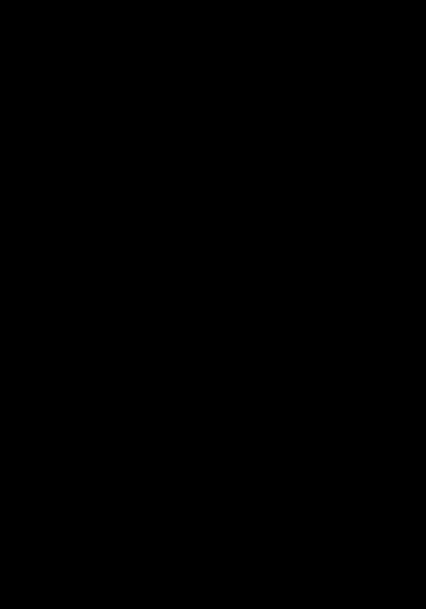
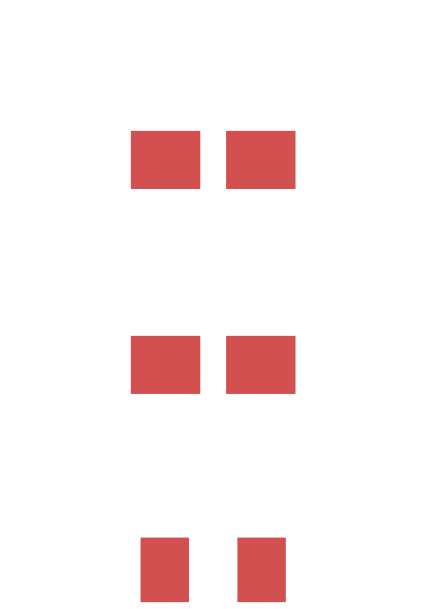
part: none -> (213, 159)
part: none -> (213, 364)
part: none -> (213, 569)

